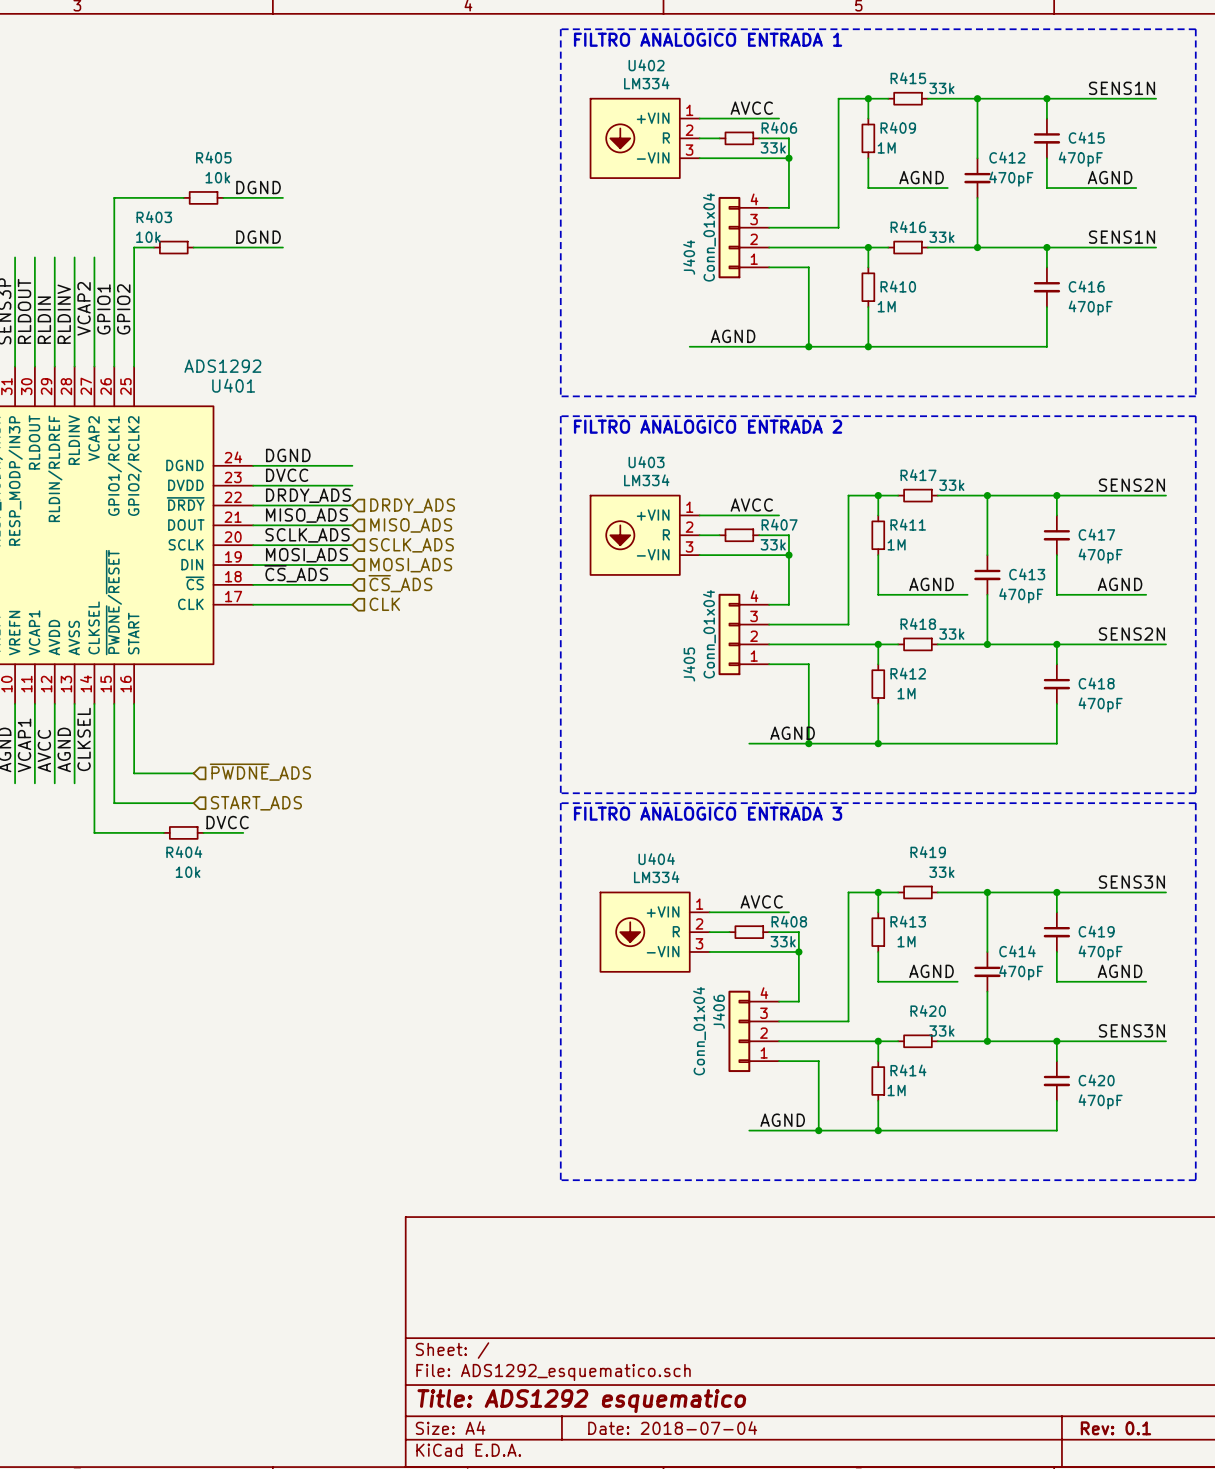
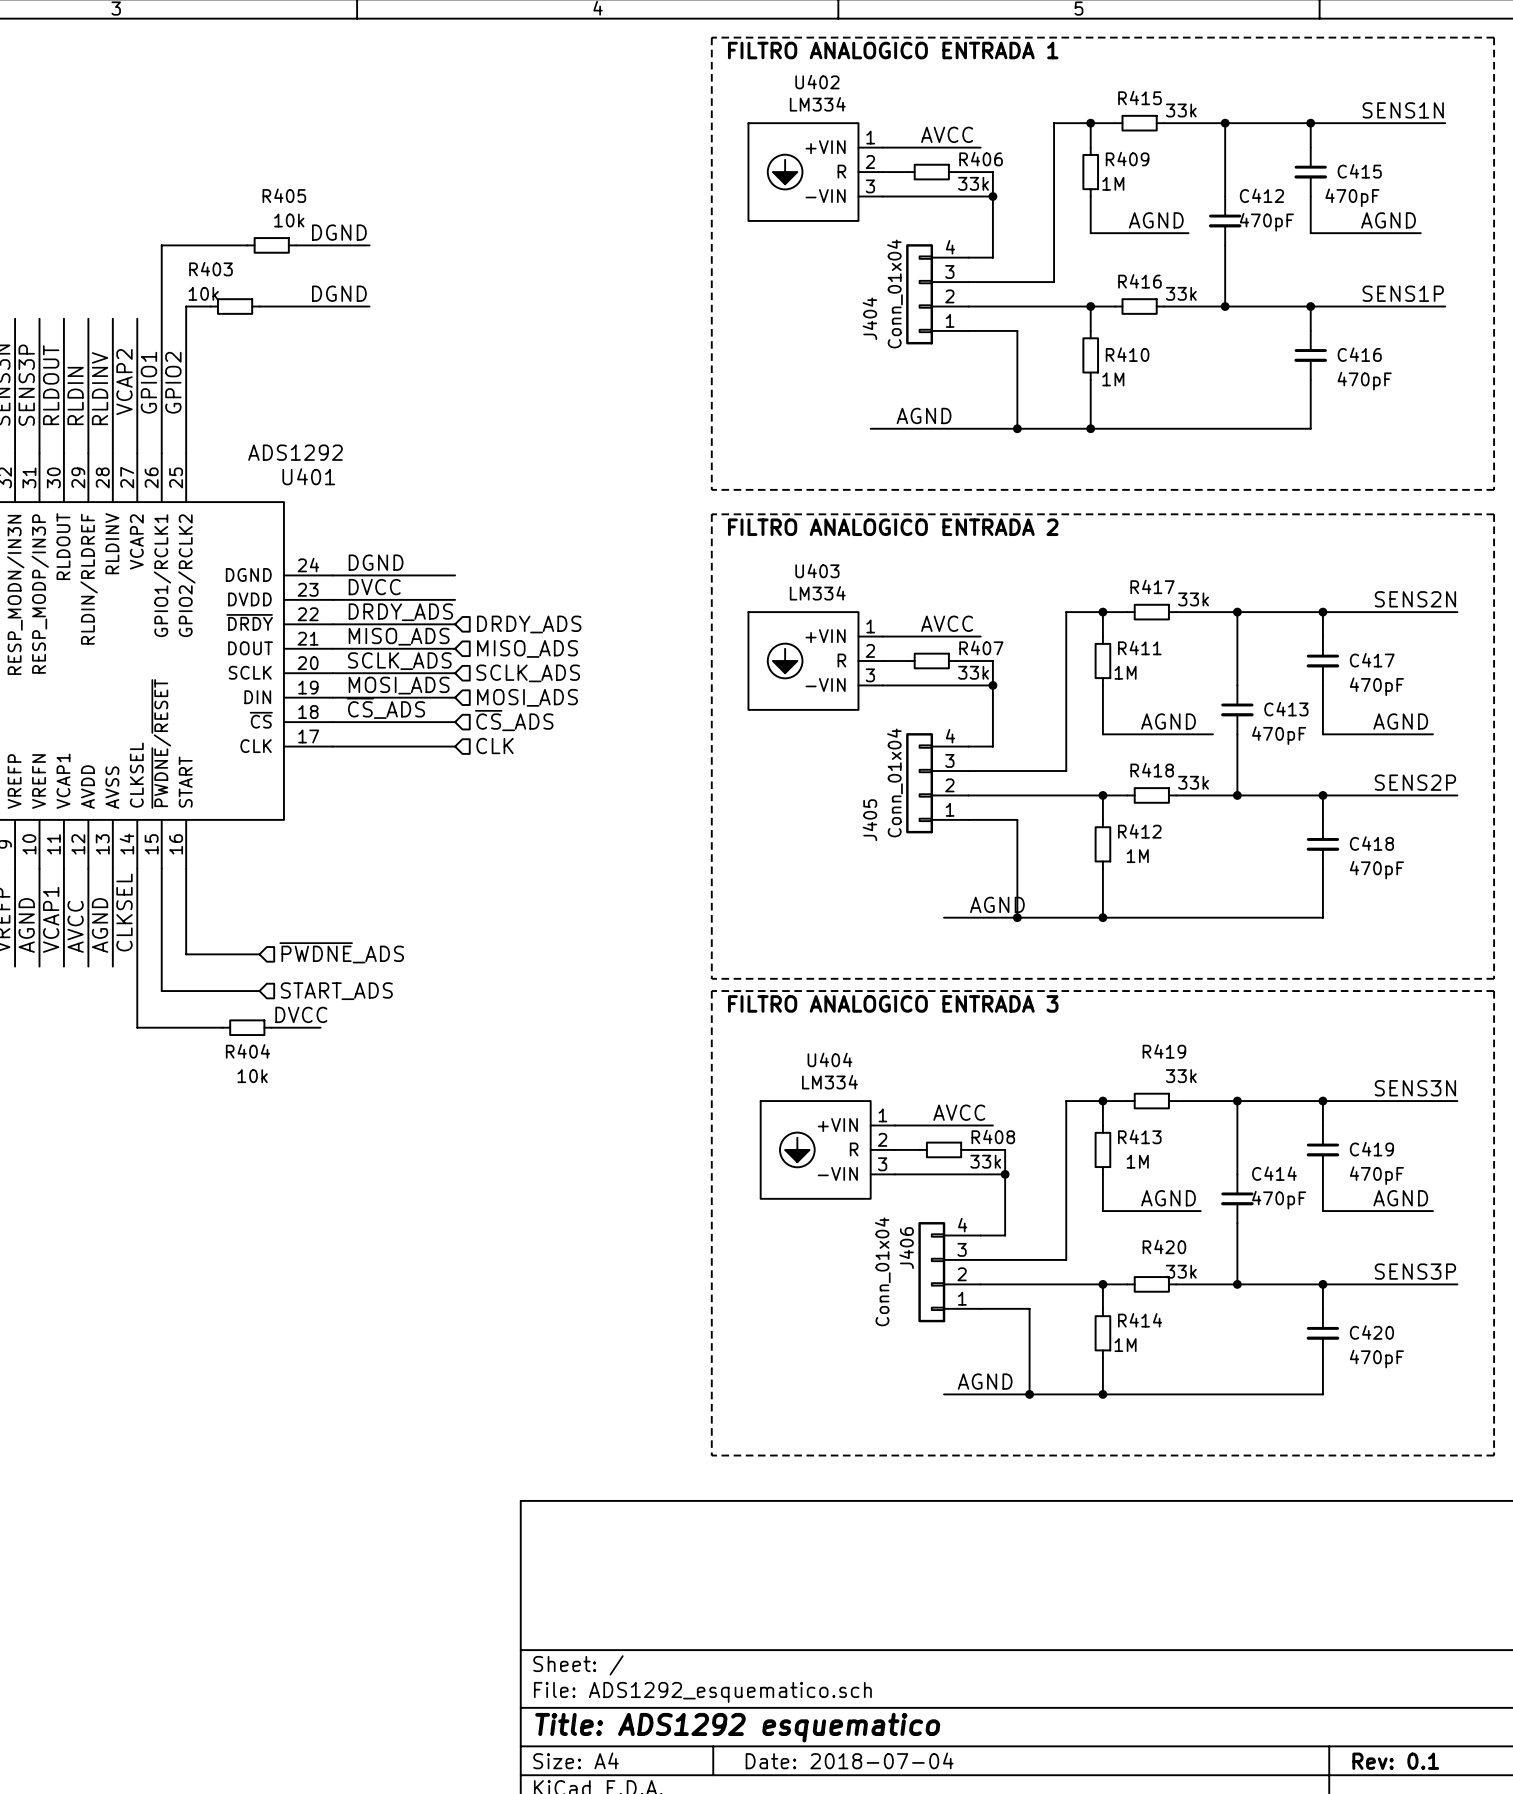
label: SENS1N (1122, 237) -> SENS1P (1403, 293)
label: SENS2N (1131, 634) -> SENS2P (1415, 782)
label: SENS3N (1131, 1030) -> SENS3P (1415, 1271)

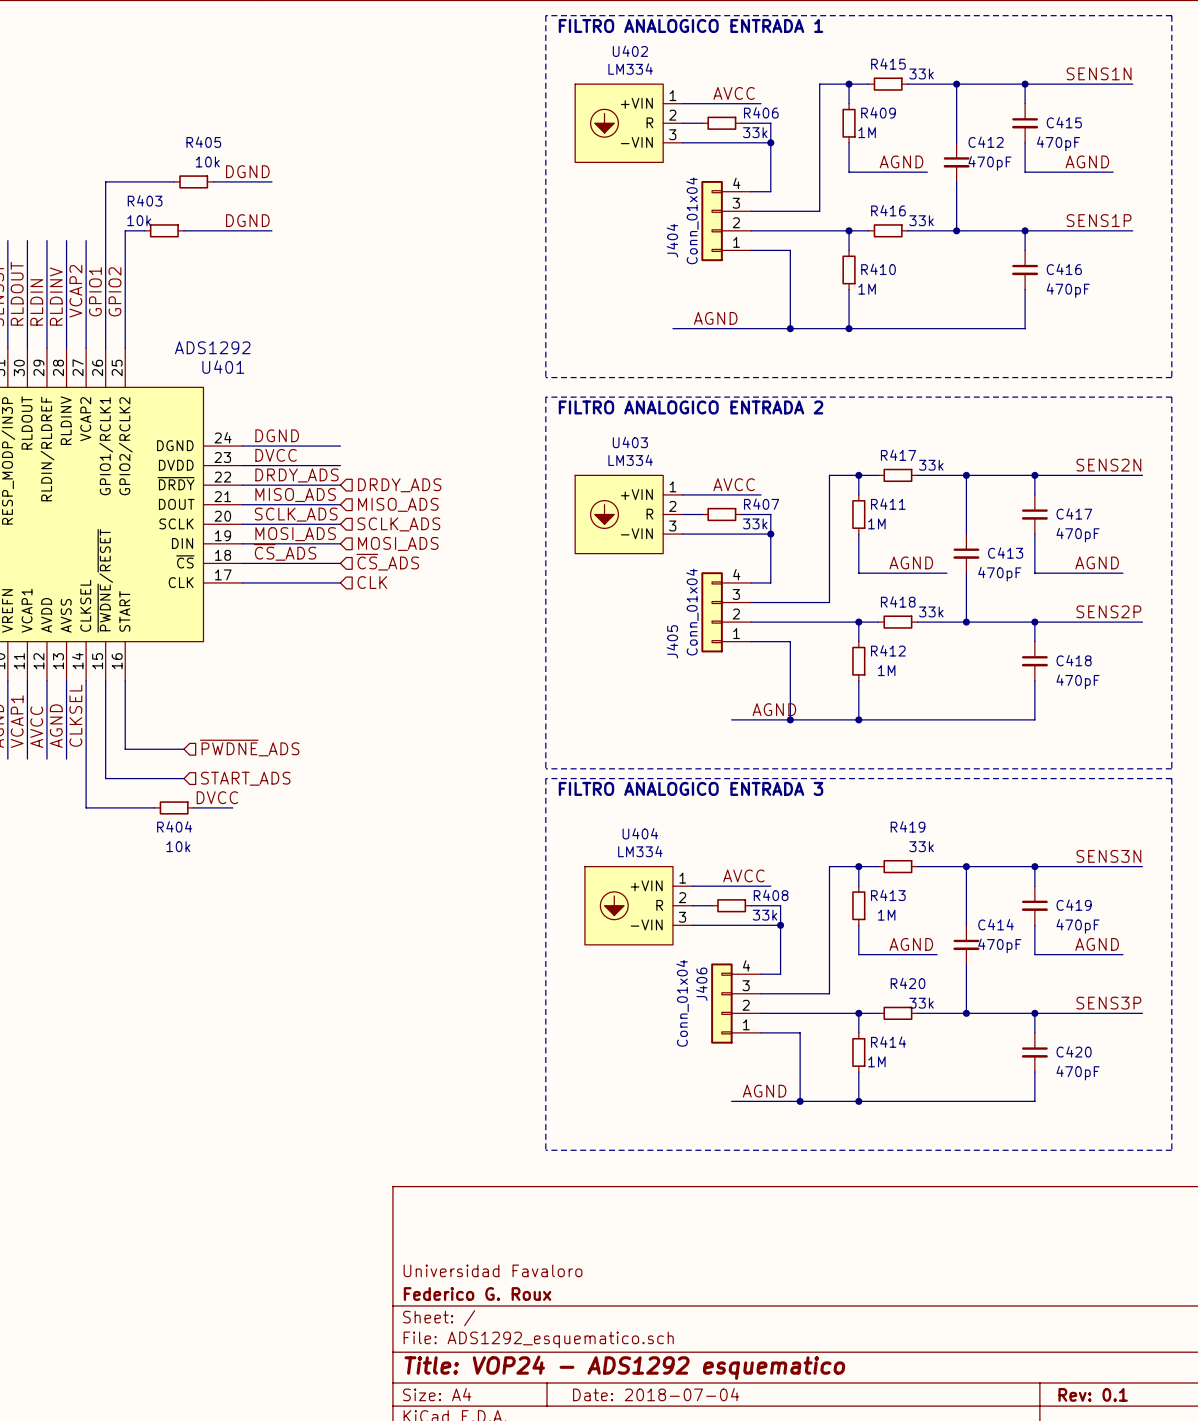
title block: none -> Universidad Favaloro (493, 1270)
title block: none -> Federico G. Roux (477, 1293)
title block: Title: ADS1292 esquematico (737, 1727) -> Title: VOP24 - ADS1292 esquematico (624, 1367)

